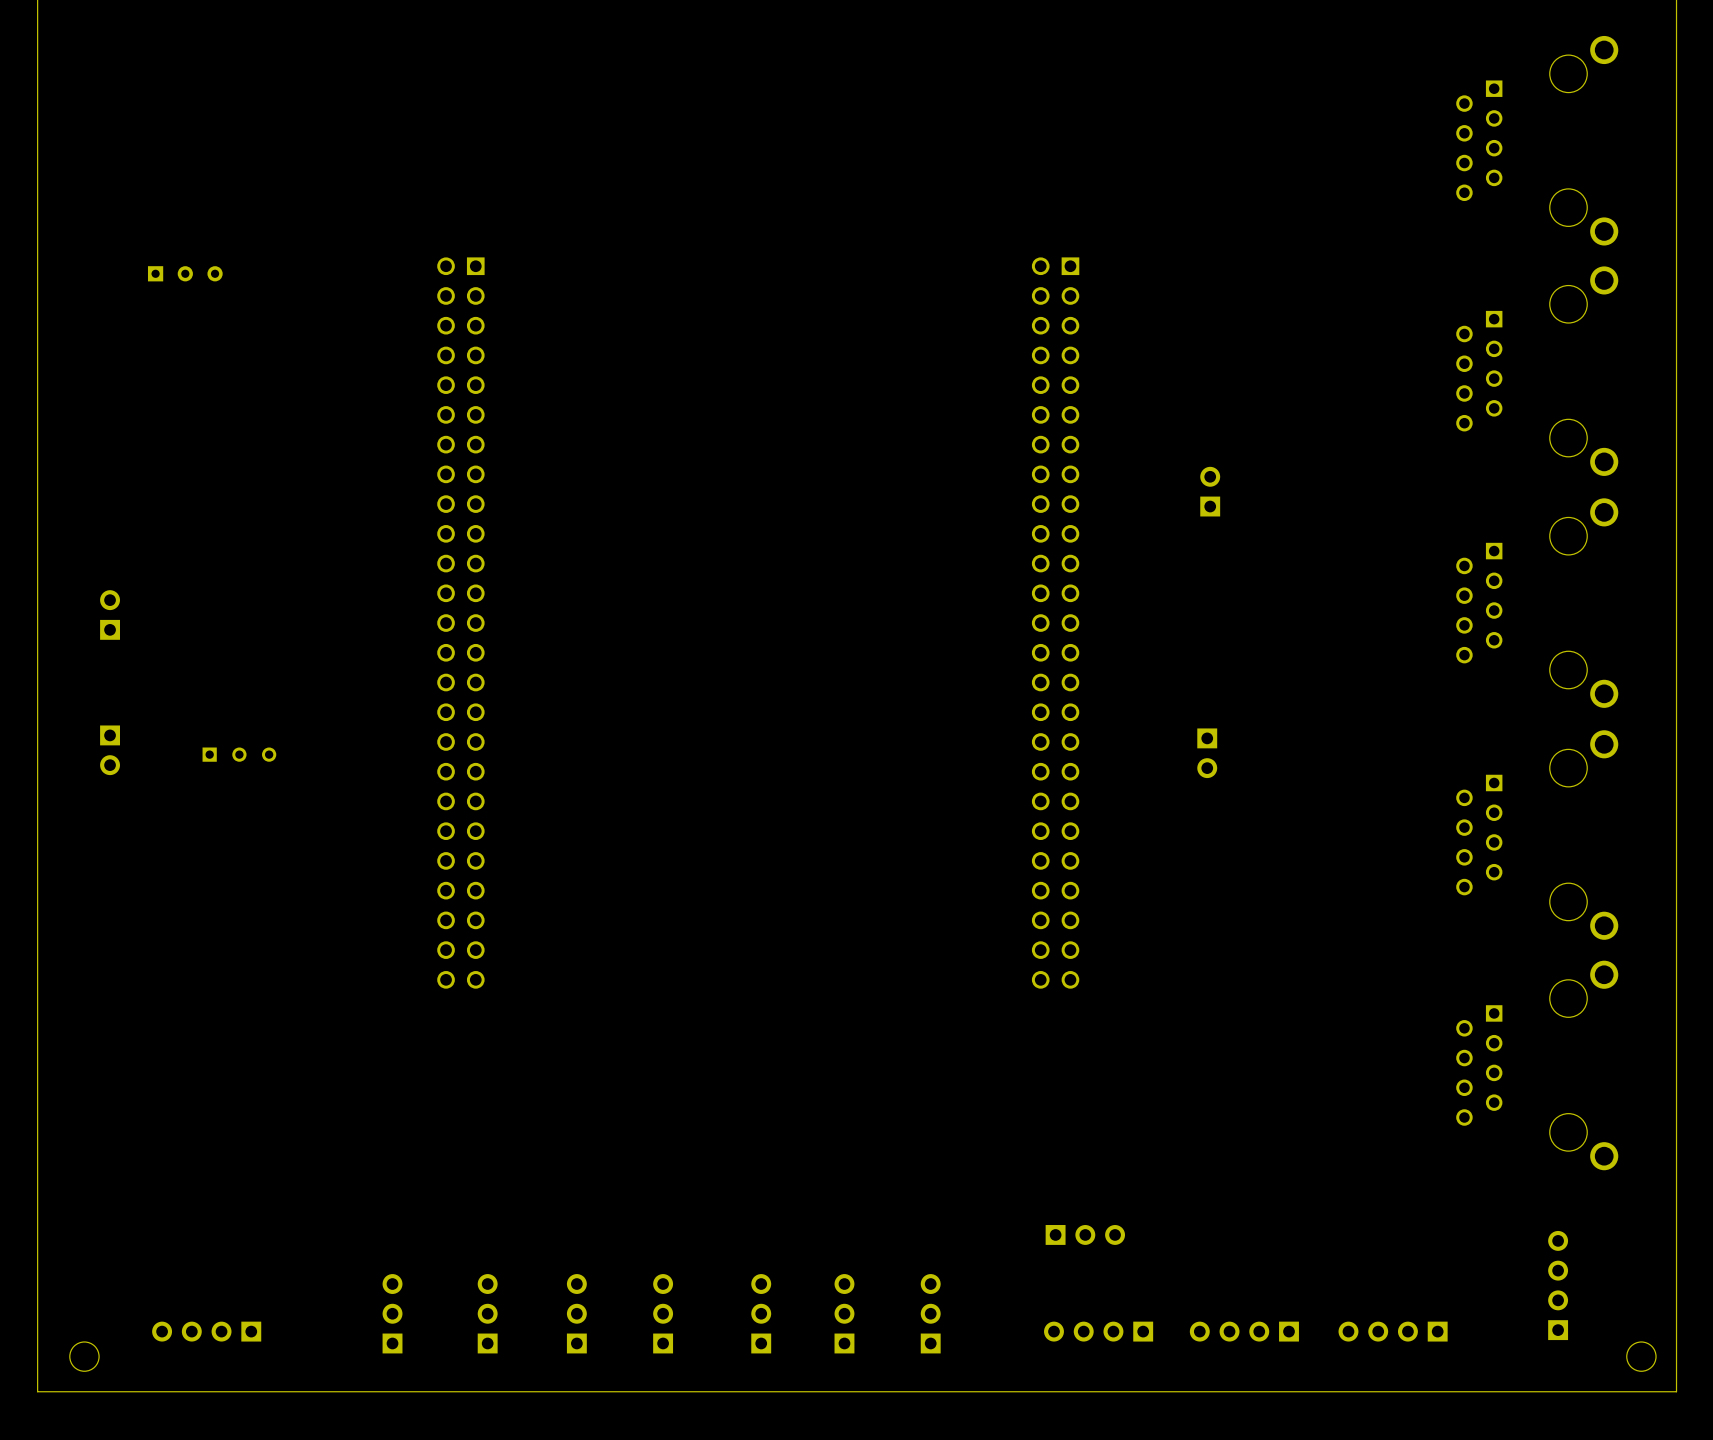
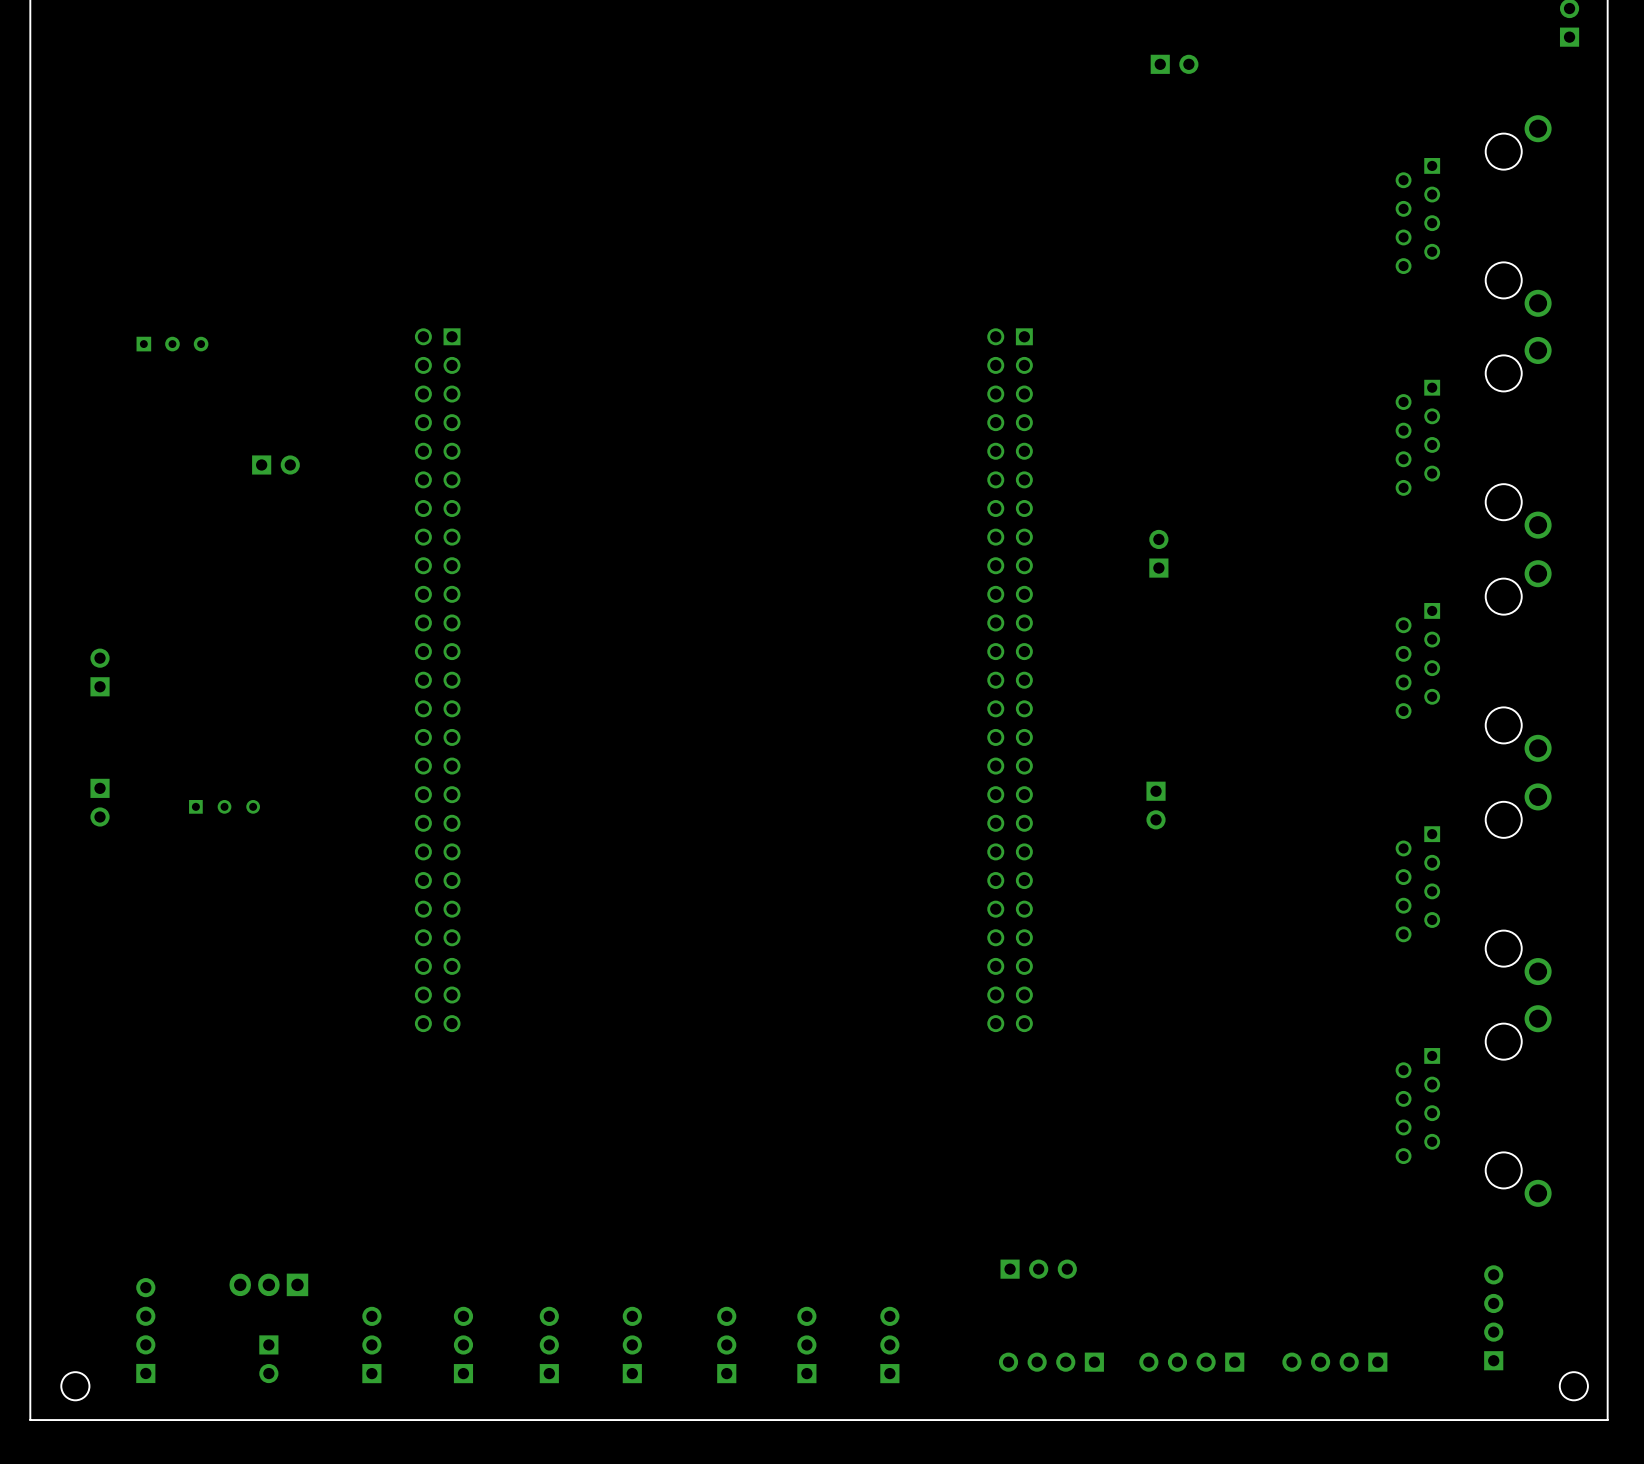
part: none -> (275, 464)
part: none -> (268, 1284)
part: none -> (268, 1359)
part rotation: 0° (206, 1331) -> 90° clockwise (145, 1330)

